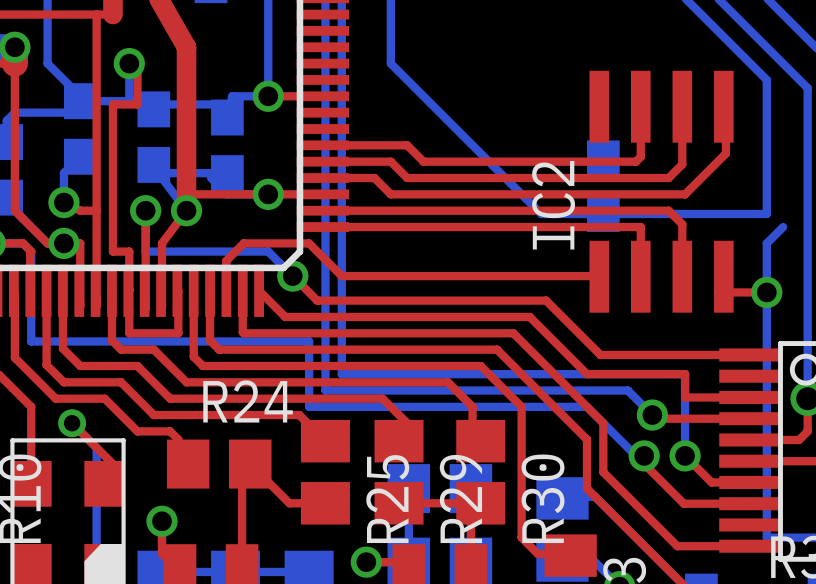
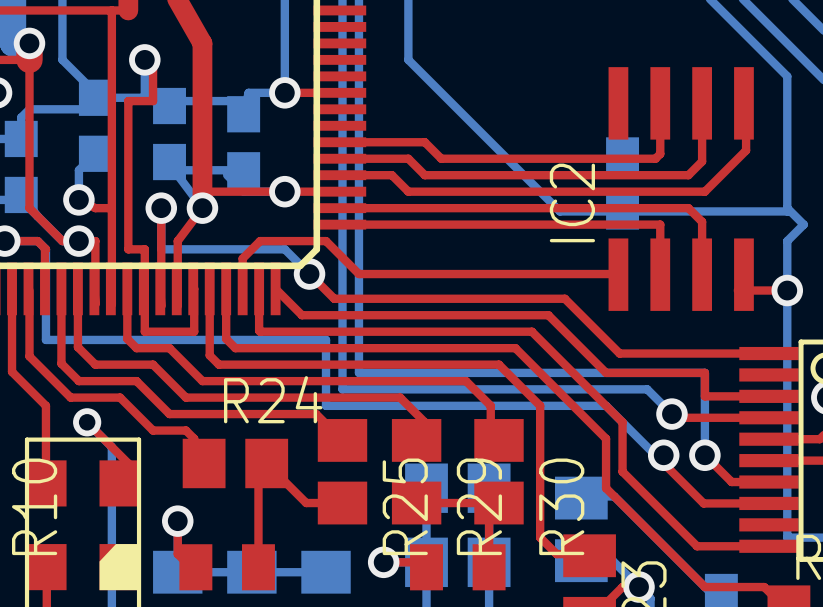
bottom track: none -> (787, 208) (803, 224)

